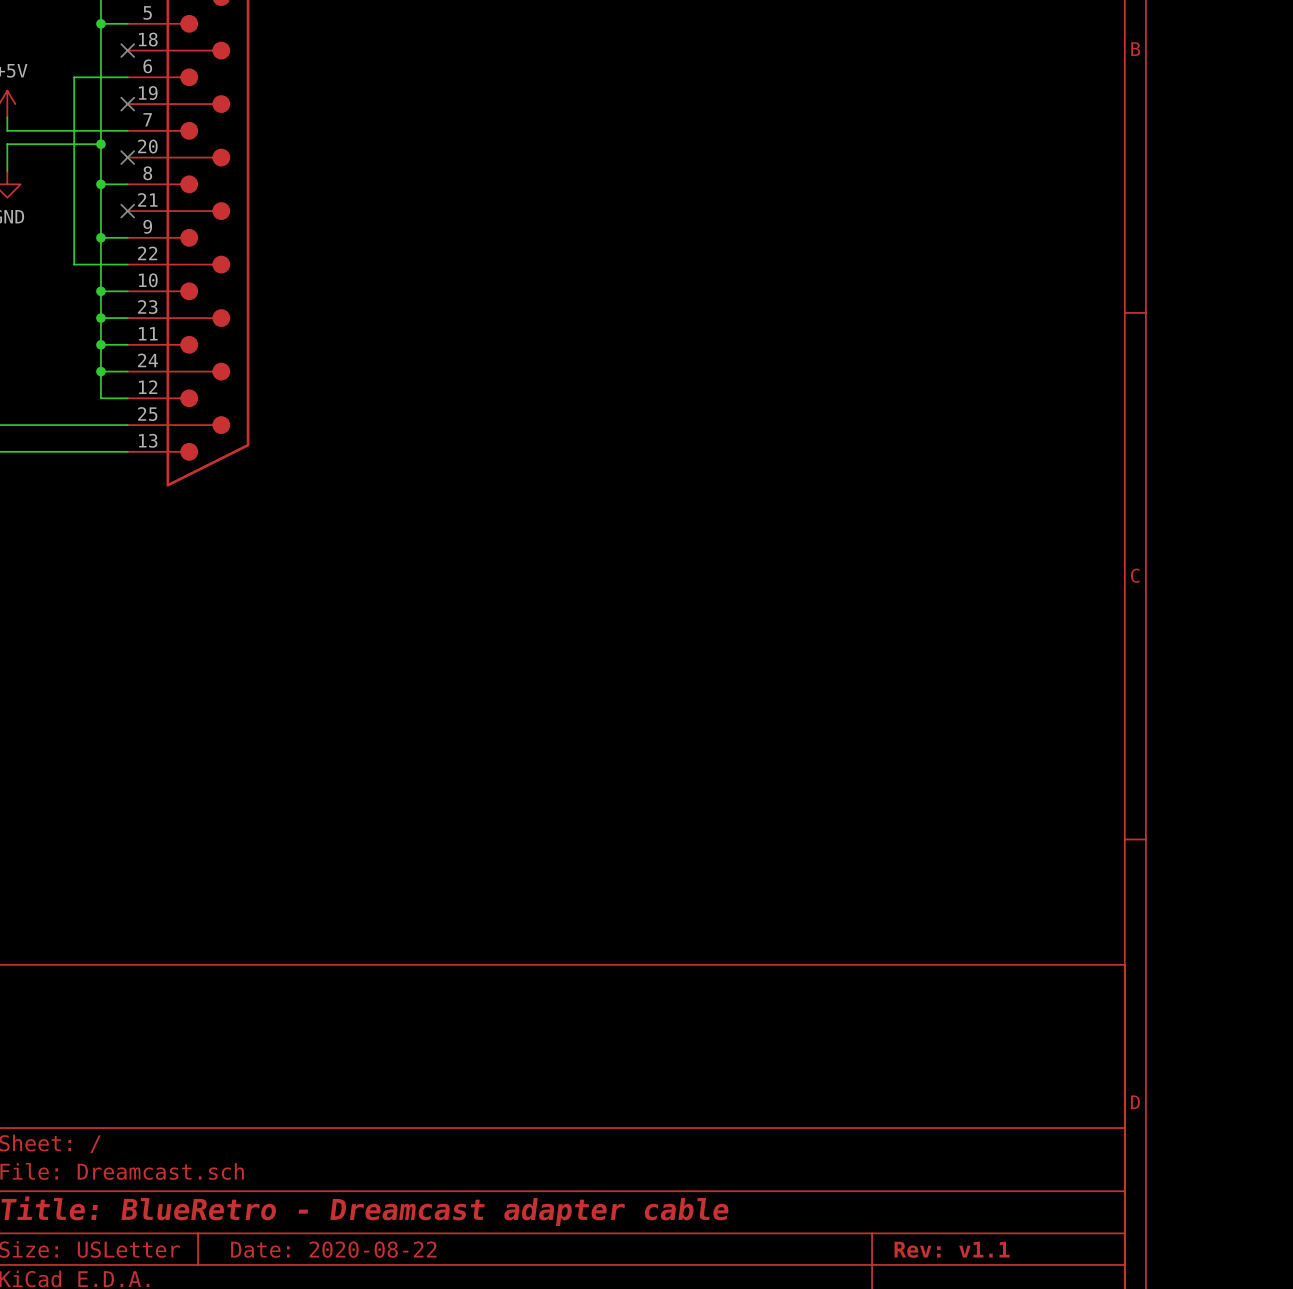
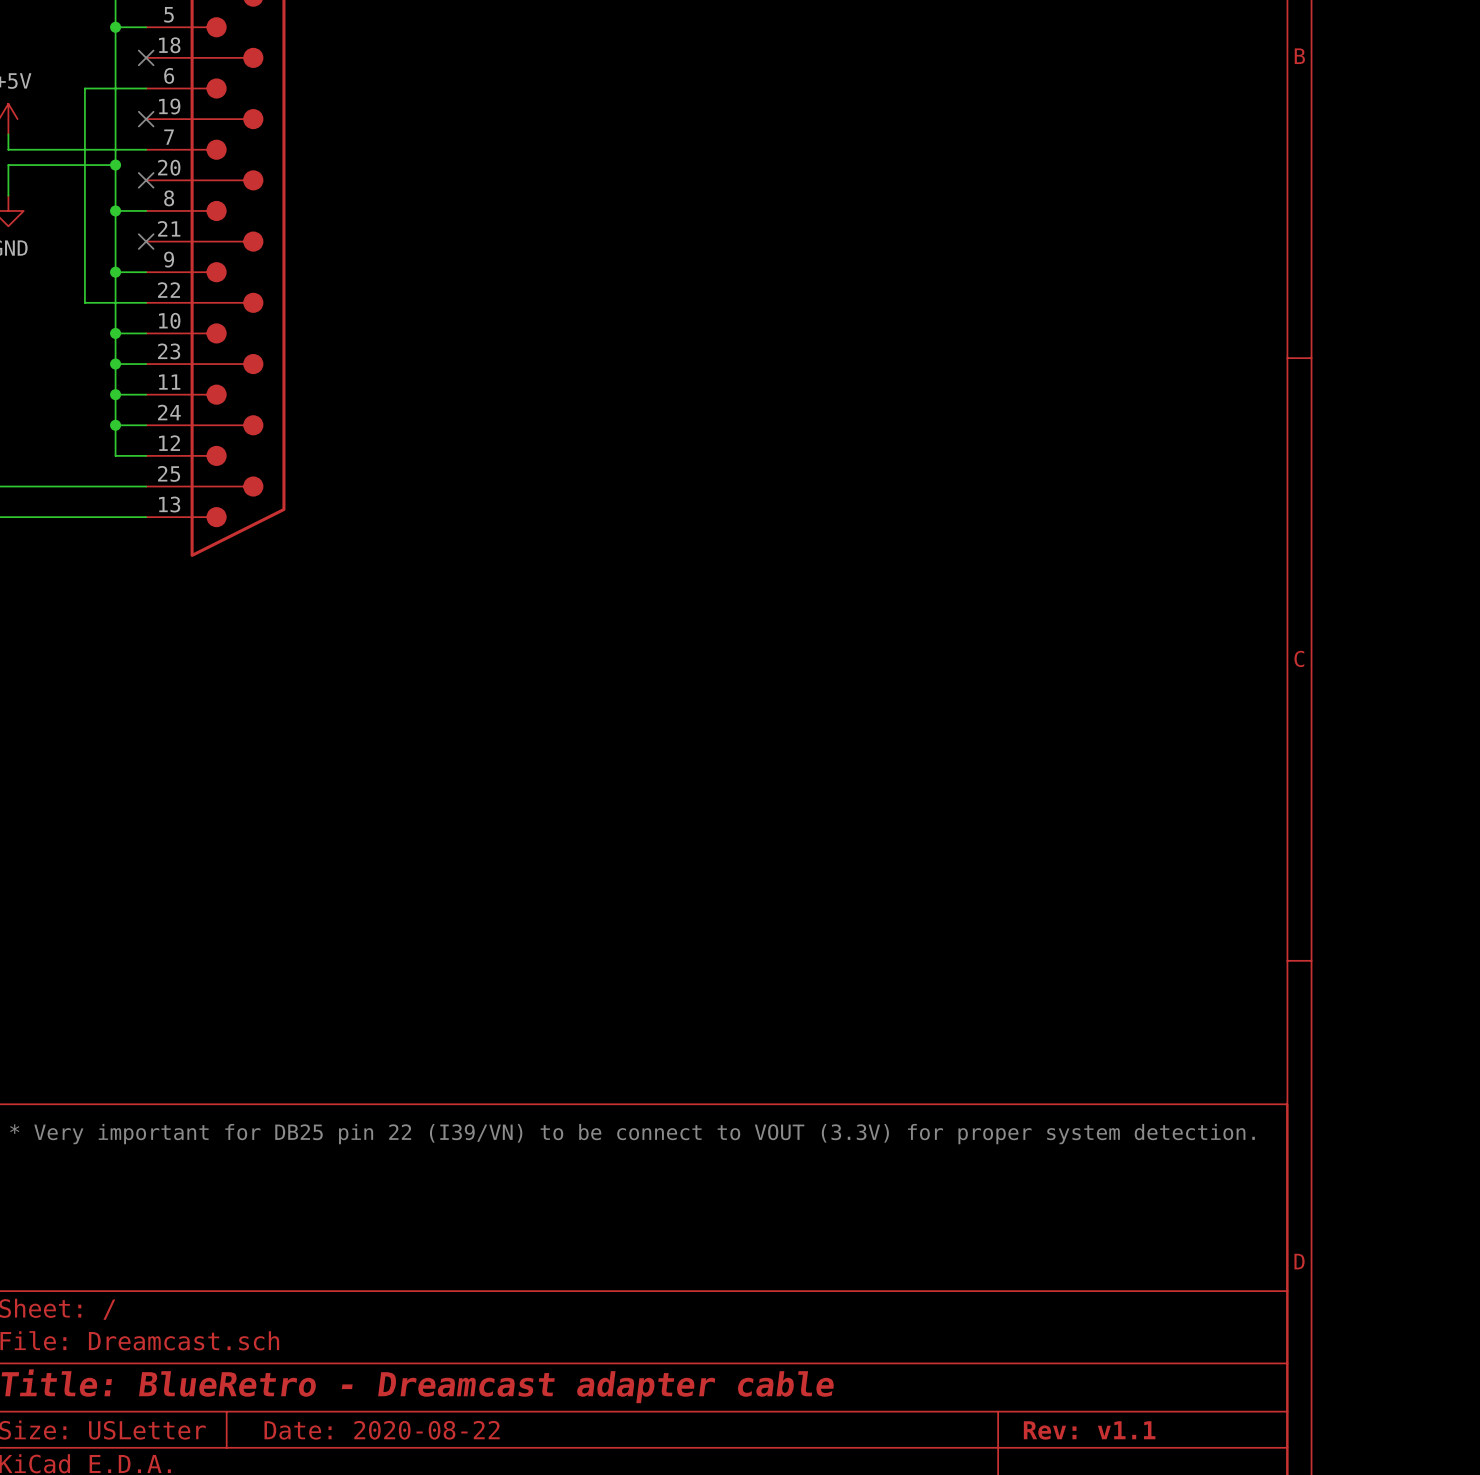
text: none -> * Very important for DB25 pin 22 (I39/VN) to be connect to VOUT (3.3V) for proper system detection. (632, 1134)

